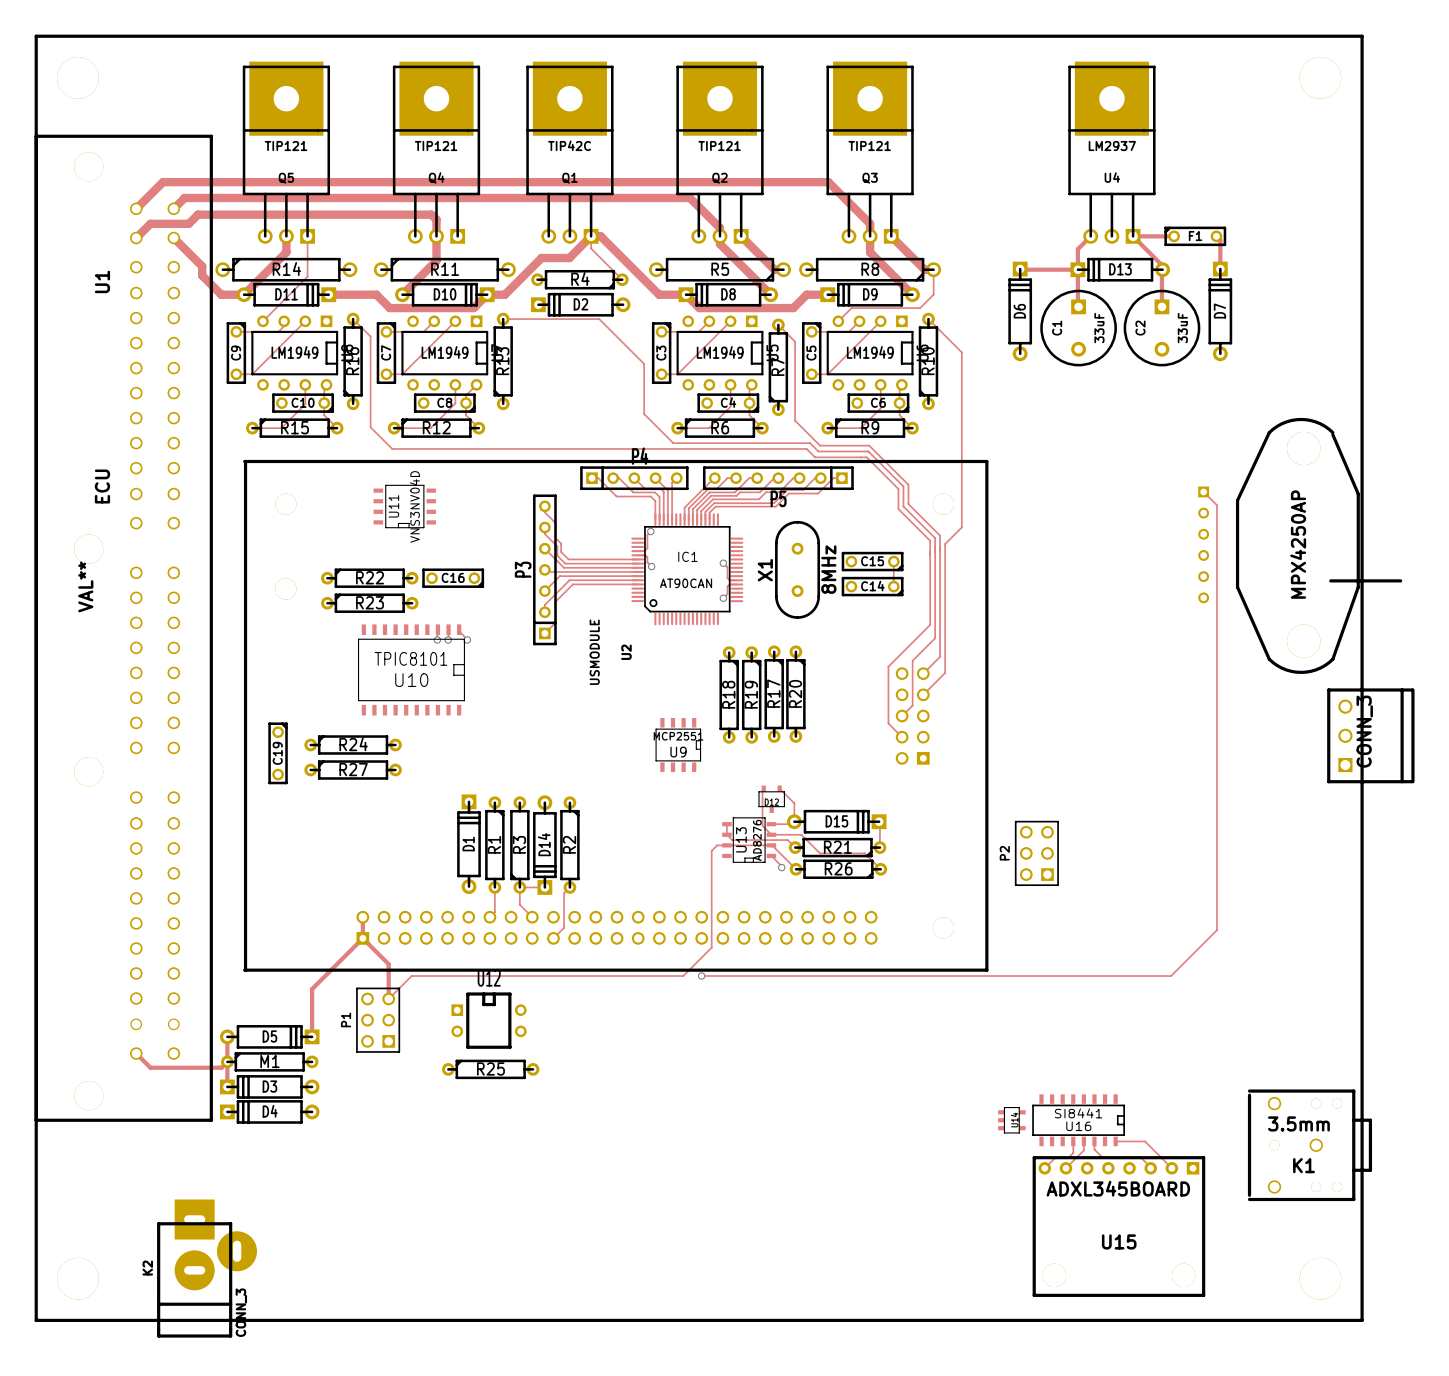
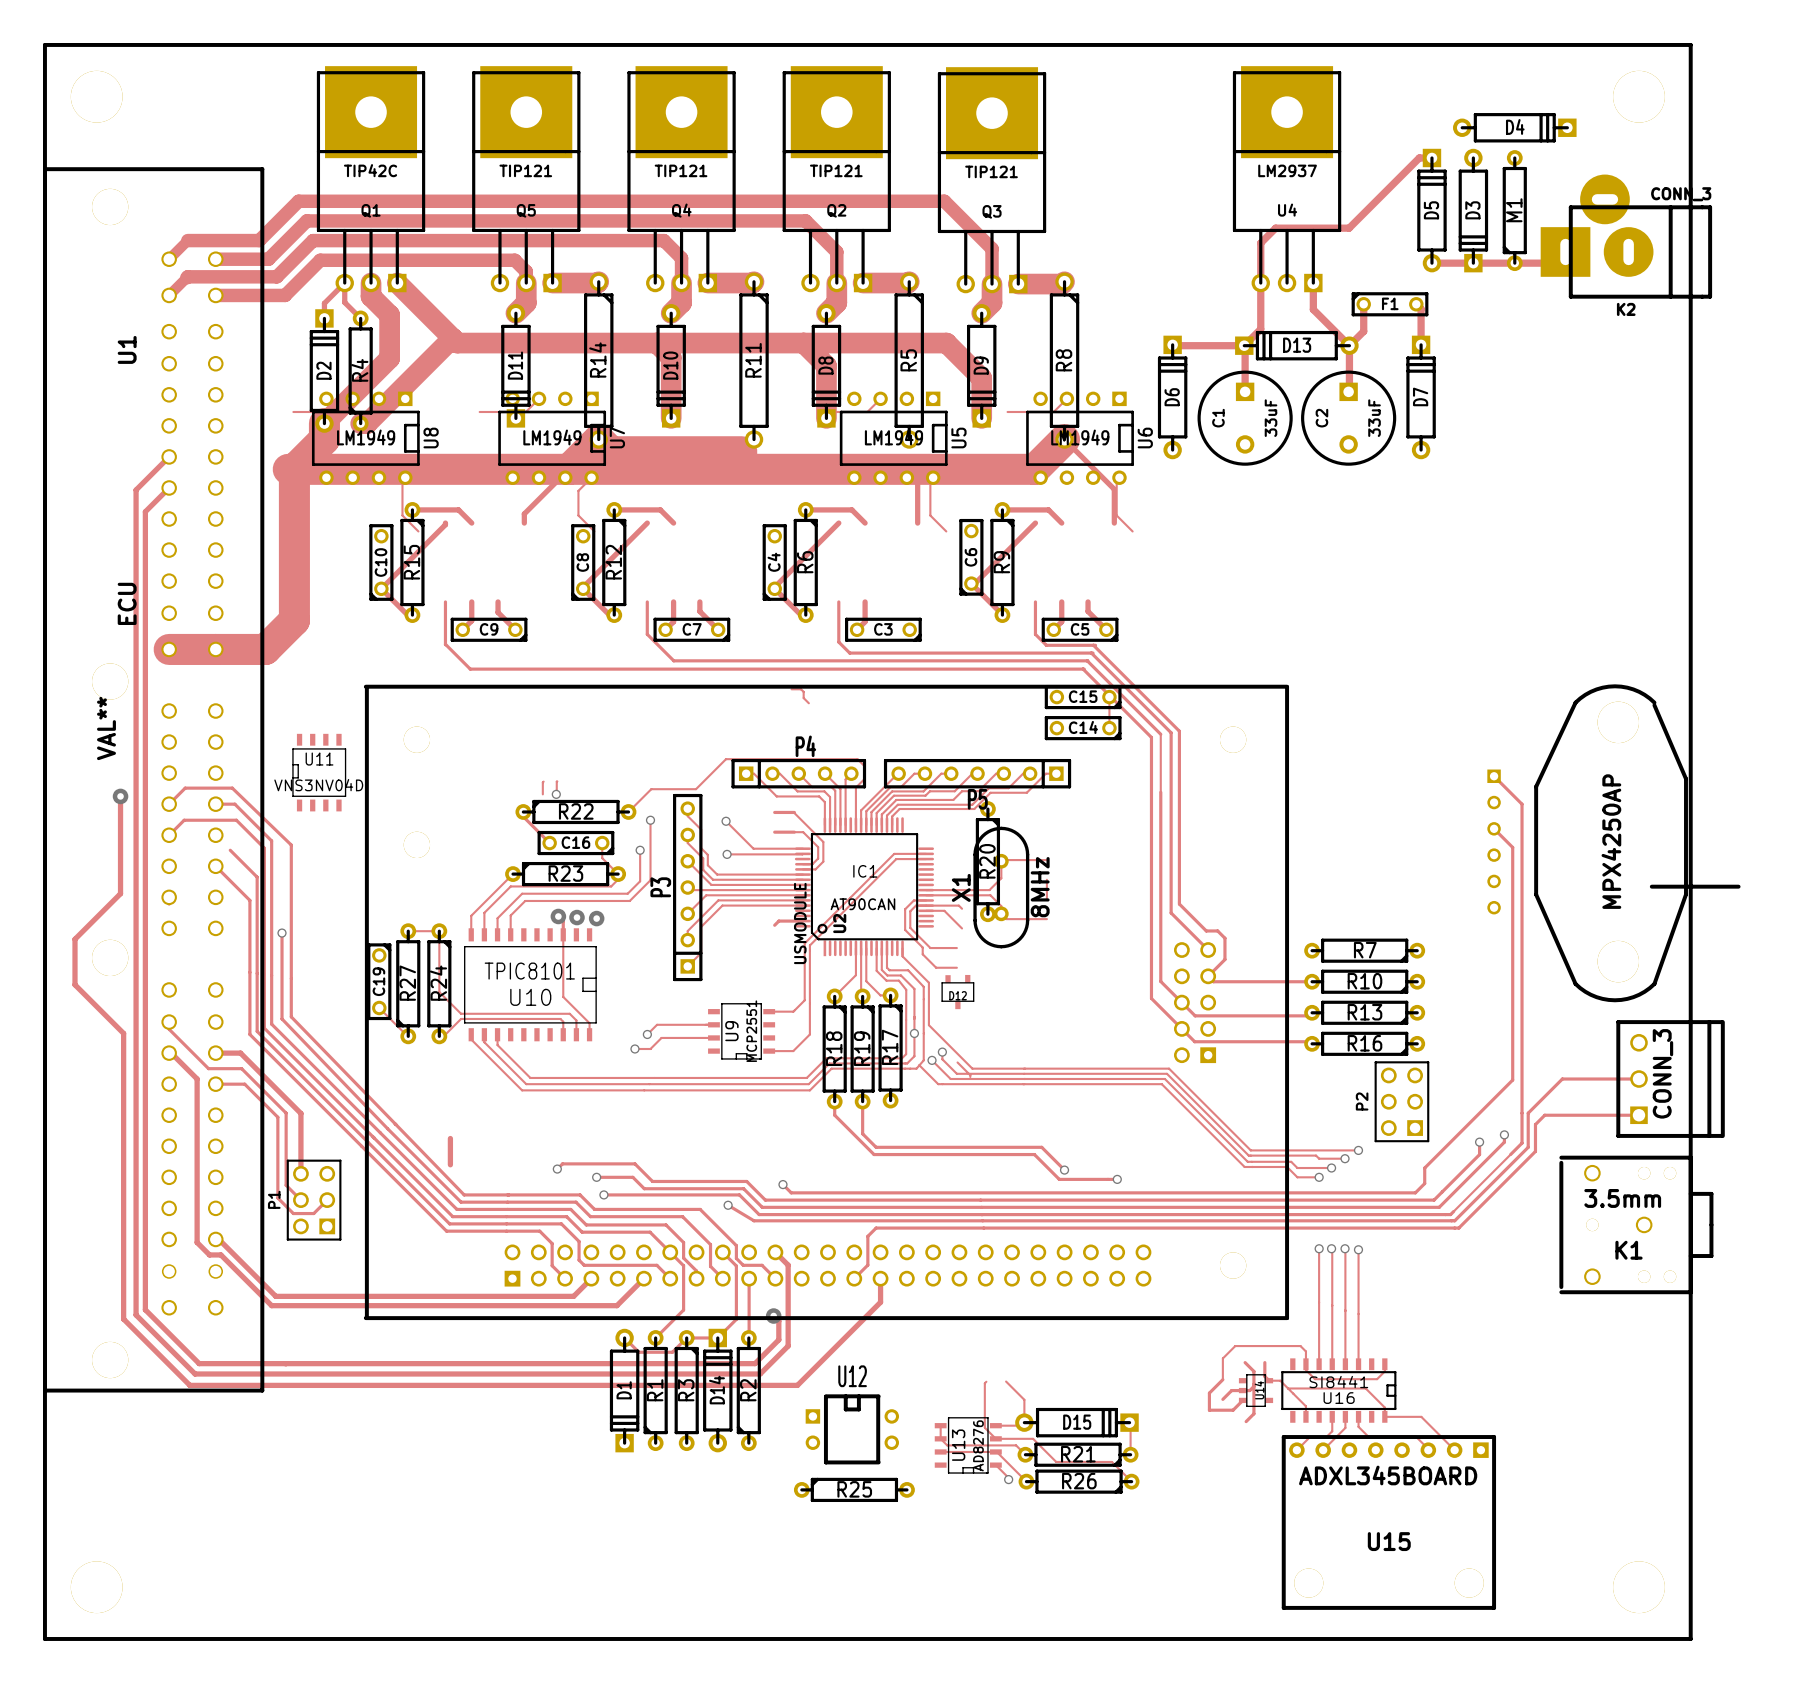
track: none -> (1431, 157) (1419, 157) (1349, 228) (1275, 228) (1260, 243) (1260, 329) (1244, 345)
Q5 position: (286, 152) -> (526, 179)
Q4 position: (436, 152) -> (681, 179)
Q1 position: (569, 152) -> (371, 179)
Q2 position: (720, 152) -> (836, 179)
Q3 position: (870, 152) -> (992, 180)
U4 position: (1111, 152) -> (1287, 179)
track: (151, 193) (162, 182) (828, 182) (870, 223) (870, 252) (912, 294) -> (187, 240) (259, 240) (298, 201) (944, 201) (992, 248) (992, 302) (981, 313)
track: none -> (1565, 251) (1554, 263) (1431, 263)
track: (173, 208) (184, 197) (689, 197) (720, 228) (720, 244) (770, 294) -> (215, 259) (268, 259) (306, 220) (805, 220) (836, 251) (836, 302) (826, 313)
track: (150, 223) (188, 223) (198, 214) (431, 214) (436, 219) (436, 260) (402, 294) -> (186, 277) (276, 276) (313, 240) (663, 240) (681, 258) (681, 302) (671, 313)
track: none -> (598, 281) (552, 283)
track: none -> (754, 281) (707, 283)
track: none -> (909, 281) (863, 283)
track: none -> (1064, 281) (1062, 284) (1018, 284)
track: none -> (371, 283) (371, 296) (389, 315) (389, 358) (324, 423) (324, 439) (294, 469) (294, 620) (265, 649) (169, 649)
track: none -> (397, 283) (457, 343) (946, 343) (981, 378) (981, 418)
track: none -> (1313, 283) (1313, 309) (1349, 345)
track: (286, 236) (286, 252) (244, 294) (221, 294) (202, 275) (202, 266) (173, 238) -> (515, 313) (526, 302) (526, 271) (514, 260) (320, 260) (285, 295) (215, 295)
track: (307, 236) (307, 276) (262, 321) -> none
track: (591, 236) (591, 248) (622, 279) -> none
track: (591, 236) (600, 236) (659, 294) (685, 294) (699, 308) (793, 308) (806, 294) (827, 294) -> none
track: (591, 236) (569, 258) (541, 258) (504, 294) (487, 294) (473, 308) (389, 308) (376, 294) (328, 294) -> none
track: (741, 236) (774, 269) (783, 269) -> none
track: (891, 236) (924, 269) (933, 269) (933, 294) (920, 308) (851, 308) (838, 321) -> none
track: (1090, 236) (1077, 249) (1078, 306) -> none
track: (1174, 236) (1133, 236) (1162, 265) (1161, 306) -> none
F1 position: (1195, 236) -> (1390, 304)
track: (1216, 236) (1220, 240) (1220, 269) -> (1416, 304) (1421, 309) (1421, 344)
track: none -> (1363, 304) (1363, 331) (1349, 345)
track: none -> (324, 318) (324, 303) (344, 283) (344, 302) (360, 318)
R14 rotation: 0° (286, 269) -> 90° clockwise (598, 360)
R14 position: (286, 269) -> (598, 360)
R11 rotation: 0° (444, 269) -> 90° clockwise (754, 360)
R11 position: (444, 269) -> (754, 360)
R5 rotation: 0° (720, 269) -> 90° counterclockwise (909, 360)
R8 rotation: 0° (870, 269) -> 90° counterclockwise (1064, 360)
track: (1020, 269) (1077, 269) -> (1172, 344) (1244, 345)
D13 position: (1120, 269) -> (1296, 345)
track: none -> (452, 338) (367, 423) (360, 423)
track: none -> (656, 343) (671, 357) (671, 418)
track: none -> (803, 343) (826, 365) (826, 418)
track: none -> (1244, 345) (1245, 391)
track: none -> (1349, 345) (1348, 391)
R4 rotation: 0° (579, 279) -> 90° clockwise (360, 371)
R4 position: (579, 279) -> (360, 371)
D11 rotation: 0° (286, 294) -> 90° clockwise (515, 365)
D11 position: (286, 294) -> (515, 365)
D10 rotation: 0° (444, 294) -> 90° clockwise (671, 365)
D10 position: (444, 294) -> (671, 365)
D8 rotation: 0° (728, 294) -> 90° counterclockwise (826, 365)
D8 position: (728, 294) -> (826, 365)
D9 rotation: 0° (870, 294) -> 90° counterclockwise (981, 365)
D9 position: (870, 294) -> (981, 365)
D2 rotation: 0° (580, 304) -> 90° clockwise (324, 371)
D2 position: (580, 304) -> (324, 371)
D6 position: (1020, 311) -> (1172, 397)
D7 position: (1220, 311) -> (1421, 397)
track: (353, 319) (370, 336) (370, 427) (392, 448) (806, 448) (815, 457) (866, 457) (898, 489) (898, 509) (930, 540) (930, 624) (888, 666) (888, 723) (902, 737) -> none
track: (503, 319) (599, 319) (644, 363) (644, 413) (673, 443) (810, 443) (818, 451) (868, 451) (903, 486) (903, 506) (935, 538) (935, 591) -> (1087, 660) (1160, 734)
track: (928, 319) (961, 352) (961, 527) (945, 544) (945, 672) (923, 694) -> none
track: (305, 321) (252, 374) (236, 374) -> none
track: (455, 321) (402, 374) (386, 374) -> none
track: (730, 321) (677, 374) (661, 374) -> none
track: (880, 321) (827, 374) (811, 374) -> none
track: (778, 324) (795, 341) (795, 420) (820, 445) (869, 445) (908, 484) (908, 504) (940, 535) (940, 656) (923, 673) -> none
C1 position: (1078, 328) -> (1245, 418)
C2 position: (1161, 328) -> (1348, 418)
C9 rotation: 0° (236, 353) -> 90° clockwise (489, 629)
C9 position: (236, 353) -> (489, 629)
C7 rotation: 0° (386, 353) -> 90° clockwise (691, 629)
C7 position: (386, 353) -> (691, 629)
C3 rotation: 0° (661, 353) -> 90° clockwise (883, 629)
C3 position: (661, 353) -> (883, 629)
C5 rotation: 0° (811, 353) -> 90° clockwise (1080, 629)
C5 position: (811, 353) -> (1080, 629)
R16 rotation: 0° (353, 361) -> 90° counterclockwise (1364, 1043)
R16 position: (353, 361) -> (1364, 1043)
R13 rotation: 0° (503, 361) -> 90° counterclockwise (1364, 1012)
R13 position: (503, 361) -> (1364, 1012)
R10 rotation: 0° (928, 361) -> 90° counterclockwise (1364, 981)
R10 position: (928, 361) -> (1364, 981)
track: none -> (741, 451) (610, 451) (598, 439) (524, 513) (524, 523)
R7 rotation: 0° (778, 367) -> 90° counterclockwise (1364, 950)
R7 position: (778, 367) -> (1364, 950)
track: none -> (169, 456) (136, 490) (136, 1315) (195, 1374) (760, 1374) (788, 1346) (788, 1265) (775, 1252)
track: none -> (288, 469) (1034, 469) (1064, 439) (1114, 489) (1114, 523)
track: none -> (904, 469) (917, 482) (917, 523)
track: (305, 384) (305, 404) (281, 428) (252, 428) -> none
track: (455, 384) (455, 403) (430, 428) (394, 428) -> none
track: (730, 384) (730, 406) (709, 428) (677, 428) -> none
track: (880, 384) (880, 408) (860, 428) (827, 428) -> none
track: none -> (169, 487) (145, 511) (145, 1309) (199, 1363) (755, 1363) (778, 1339) (778, 1321) (773, 1316)
C10 rotation: 0° (303, 403) -> 90° clockwise (381, 562)
C10 position: (303, 403) -> (381, 562)
C8 rotation: 0° (444, 403) -> 90° clockwise (583, 562)
C8 position: (444, 403) -> (583, 562)
C4 rotation: 0° (728, 403) -> 90° clockwise (774, 562)
C4 position: (728, 403) -> (774, 562)
C6 rotation: 0° (878, 403) -> 90° clockwise (971, 557)
C6 position: (878, 403) -> (971, 557)
track: none -> (412, 509) (458, 509) (471, 523)
track: none -> (614, 509) (660, 509) (673, 523)
track: none -> (805, 509) (851, 509) (865, 523)
track: none -> (1002, 509) (1048, 509) (1061, 523)
R6 footprint: [671, 418, 769, 438] -> [793, 502, 818, 623]
track: none -> (445, 523) (381, 588) (407, 615) (412, 615)
track: none -> (647, 523) (583, 587) (609, 615) (614, 615)
track: none -> (838, 523) (774, 587) (801, 615) (805, 615)
track: none -> (1035, 523) (974, 583) (971, 583) (1002, 615)
R15 rotation: 0° (294, 428) -> 90° clockwise (412, 562)
R12 rotation: 0° (436, 428) -> 90° clockwise (614, 562)
R12 position: (436, 428) -> (614, 562)
R9 rotation: 0° (870, 428) -> 90° clockwise (1002, 562)
R9 position: (870, 428) -> (1002, 562)
track: (592, 478) (598, 478) (616, 496) (650, 496) (655, 501) (655, 519) -> (746, 773) (753, 773) (776, 796) (819, 796) (824, 802) (824, 825)
track: (613, 478) (619, 478) (633, 492) (655, 492) (659, 496) (659, 519) -> (772, 773) (779, 773) (797, 791) (824, 791) (830, 797) (830, 825)
track: (634, 478) (645, 489) (660, 489) (663, 491) (663, 519) -> (798, 773) (812, 787) (831, 787) (835, 790) (835, 825)
P4 position: (634, 478) -> (798, 773)
track: (655, 478) (667, 490) (667, 519) -> (825, 773) (840, 789) (840, 825)
track: (676, 478) (672, 482) (672, 519) -> (851, 773) (845, 779) (845, 825)
track: (714, 478) (684, 507) (684, 519) -> (898, 773) (861, 810) (861, 825)
track: (736, 478) (727, 478) (716, 489) (708, 489) (688, 508) (688, 519) -> (924, 773) (914, 773) (900, 787) (890, 787) (866, 811) (866, 825)
track: (757, 478) (749, 478) (734, 492) (709, 492) (692, 509) (692, 519) -> (951, 773) (941, 773) (923, 791) (892, 791) (871, 812) (871, 825)
track: (778, 478) (774, 478) (760, 492) (740, 492) (736, 495) (711, 495) (697, 509) (697, 519) -> (977, 773) (972, 773) (954, 791) (929, 791) (925, 795) (894, 795) (876, 813) (876, 825)
P5 position: (778, 478) -> (977, 773)
track: (799, 478) (793, 478) (779, 492) (765, 492) (758, 499) (713, 499) (701, 511) (701, 519) -> (1003, 773) (996, 773) (978, 791) (962, 791) (953, 799) (896, 799) (881, 814) (881, 825)
track: (820, 478) (815, 478) (803, 489) (787, 489) (774, 503) (714, 503) (705, 511) (705, 519) -> (1030, 773) (1023, 773) (1008, 788) (988, 788) (972, 804) (897, 804) (886, 815) (886, 825)
track: (841, 478) (833, 478) (818, 493) (788, 493) (775, 506) (715, 506) (709, 512) (709, 519) -> (1056, 773) (1045, 773) (1026, 792) (990, 792) (974, 809) (899, 809) (892, 816) (892, 825)
track: none -> (445, 601) (445, 644)
track: none -> (471, 601) (471, 620) (462, 629)
track: none -> (498, 601) (498, 612) (515, 629)
track: none -> (647, 601) (647, 634) (673, 660) (1087, 660)
track: none -> (673, 601) (673, 621) (665, 629)
track: none -> (699, 601) (699, 611) (718, 629)
track: none -> (838, 601) (838, 642) (849, 653) (1093, 653)
track: none -> (865, 601) (865, 621) (857, 629)
track: none -> (1035, 601) (1035, 634) (1046, 645) (1095, 645)
track: none -> (1061, 601) (1061, 621) (1053, 629)
track: none -> (1088, 601) (1088, 611) (1106, 629)
track: (1203, 491) (1217, 505) (1217, 930) -> (1494, 776) (1522, 804) (1522, 1143) (1510, 1154)
U11 rotation: 0° (404, 506) -> 90° clockwise (319, 772)
U11 position: (404, 506) -> (319, 772)
track: (544, 506) (544, 512) (555, 523) (555, 538) (561, 543) (561, 551) (568, 559) (637, 559) -> (687, 808) (687, 816) (701, 829) (701, 848) (707, 854) (707, 865) (717, 874) (802, 874)
track: none -> (445, 644) (470, 669) (1084, 669)
track: none -> (1093, 645) (1179, 731) (1179, 904) (1206, 930) (1217, 930) (1224, 938) (1224, 959) (1208, 976) (1213, 981) (1312, 981)
track: none -> (1091, 653) (1171, 732) (1171, 912) (1208, 950)
track: (544, 527) (544, 534) (557, 546) (557, 555) (565, 563) (637, 563) -> (687, 834) (687, 843) (703, 858) (703, 869) (713, 879) (802, 879)
track: (650, 531) (647, 534) (647, 548) (644, 551) (637, 551) -> none
via: (650, 531) -> none
track: none -> (1083, 669) (1151, 737) (1151, 998) (1194, 1041) (1309, 1041) (1312, 1043)
part position: (1300, 545) -> (1613, 843)
track: (544, 548) (563, 567) (637, 567) -> (687, 861) (711, 884) (802, 884)
track: (723, 563) (727, 567) (727, 578) (729, 580) (736, 580) -> none
via: (723, 563) -> none
via: (651, 566) -> none
track: (544, 569) (546, 571) (637, 571) -> (687, 887) (690, 890) (802, 890)
P3 position: (544, 569) -> (687, 887)
IC1 position: (687, 569) -> (864, 886)
X1 position: (797, 569) -> (1001, 887)
track: (637, 576) (559, 576) (544, 591) -> (802, 895) (706, 895) (687, 913)
R22 position: (369, 578) -> (575, 811)
C16 position: (453, 578) -> (575, 843)
track: (637, 580) (569, 580) (544, 604) (544, 612) -> (802, 900) (718, 900) (687, 931) (687, 940)
track: (637, 584) (572, 584) (555, 601) (555, 622) (544, 633) -> (802, 905) (722, 905) (701, 926) (701, 952) (687, 966)
track: (736, 584) (729, 584) (727, 586) (727, 594) (723, 598) -> none
via: (723, 598) -> none
R23 position: (369, 603) -> (565, 874)
track: (459, 629) (467, 639) -> none
track: (935, 638) (912, 660) (912, 705) (902, 715) -> (1160, 792) (1160, 981) (1195, 1015) (1309, 1015) (1312, 1012)
via: (437, 639) -> none
via: (467, 639) -> none
track: none -> (120, 796) (120, 893) (74, 939) (74, 984) (123, 1033) (123, 1319) (189, 1385) (797, 1385) (880, 1302) (880, 1278)
via: none -> (120, 796)
R18 footprint: [719, 646, 739, 744] -> [822, 988, 847, 1110]
track: none -> (169, 804) (185, 788) (232, 788) (291, 845) (291, 1016) (395, 1124)
track: none -> (215, 804) (234, 804) (271, 840) (271, 1024) (456, 1209) (570, 1209) (586, 1224) (666, 1224) (683, 1242) (683, 1258) (696, 1270) (696, 1278)
track: none -> (523, 811) (523, 816) (549, 843)
track: none -> (628, 811) (651, 789) (696, 789) (726, 759) (857, 759) (864, 766) (864, 778) (855, 787) (855, 825)
track: none -> (774, 812) (794, 812) (823, 841) (823, 861) (815, 869) (802, 869)
track: none -> (650, 820) (650, 880) (629, 900) (525, 900) (510, 915) (510, 934)
via: none -> (650, 820)
track: none -> (726, 821) (753, 848) (802, 848)
via: none -> (726, 821)
track: none -> (1494, 828) (1512, 847) (1512, 1080) (1424, 1168) (1424, 1183) (1415, 1192) (791, 1192) (782, 1184)
U10 position: (411, 669) -> (530, 984)
track: none -> (774, 832) (803, 832) (818, 847) (818, 858) (812, 864) (802, 864)
track: none -> (169, 835) (184, 820) (236, 820) (264, 848) (264, 1028) (452, 1216) (566, 1216) (582, 1232) (650, 1232) (683, 1265) (683, 1310) (655, 1337)
track: none -> (602, 843) (602, 858) (618, 874) (618, 879) (611, 886) (510, 886) (484, 912) (484, 934)
track: none -> (230, 850) (257, 877) (257, 1031) (449, 1223) (561, 1223) (579, 1241) (579, 1260) (584, 1265) (656, 1265) (670, 1278)
track: none -> (640, 850) (640, 881) (627, 893) (522, 893) (497, 918) (497, 934)
via: none -> (640, 850)
track: none -> (802, 853) (727, 854)
track: none -> (926, 853) (894, 853) (804, 943) (804, 1000) (793, 1011) (769, 1011)
via: none -> (727, 854)
track: none -> (926, 859) (896, 859) (809, 945) (809, 1034) (793, 1051) (769, 1051)
track: none -> (1046, 860) (1002, 860) (1001, 878) (989, 890) (926, 890)
R19 position: (751, 694) -> (862, 1049)
R17 position: (774, 694) -> (890, 1047)
track: none -> (215, 866) (249, 900) (249, 1034) (446, 1231) (539, 1231) (552, 1243) (552, 1265) (565, 1278)
track: none -> (513, 874) (471, 915) (471, 934)
track: none -> (1046, 879) (1046, 899)
U2 position: (615, 715) -> (826, 1002)
track: none -> (926, 895) (990, 895) (1001, 906) (1001, 913) (1006, 919) (1046, 919)
track: none -> (926, 900) (913, 900) (905, 909) (905, 929) (922, 947) (922, 954) (936, 967) (956, 967)
track: none -> (962, 908) (958, 905) (915, 905) (910, 911) (910, 927) (930, 948) (956, 948)
track: none -> (926, 910) (944, 910) (962, 928)
part position: (1370, 735) -> (1670, 1079)
track: none -> (558, 916) (563, 921) (563, 996) (589, 1023) (589, 1034)
via: none -> (558, 916)
via: none -> (576, 917)
via: none -> (596, 918)
track: none -> (802, 921) (778, 921) (774, 925)
R24 rotation: 0° (353, 744) -> 90° clockwise (439, 983)
U9 rotation: 0° (678, 745) -> 90° clockwise (741, 1031)
U9 position: (678, 745) -> (741, 1031)
track: none -> (408, 931) (439, 931) (439, 992) (461, 1013) (569, 1013) (576, 1020) (576, 1034)
track: none -> (282, 933) (282, 1018) (461, 1202) (575, 1202) (590, 1216) (682, 1216) (710, 1244) (710, 1266) (722, 1278)
via: none -> (282, 933)
C19 position: (278, 753) -> (379, 981)
track: none -> (855, 948) (855, 975) (834, 996)
track: none -> (861, 948) (862, 996)
track: none -> (866, 948) (866, 981) (880, 995) (890, 995)
track: none -> (876, 948) (876, 970) (886, 980) (898, 980) (906, 989) (906, 1054) (902, 1058) (826, 1058) (806, 1077) (530, 1077) (497, 1045) (497, 1034)
track: none -> (881, 948) (881, 969) (887, 975) (900, 975) (914, 988) (914, 1056) (907, 1063) (829, 1063) (808, 1084) (526, 1084) (484, 1042) (484, 1034)
track: none -> (886, 948) (886, 967) (889, 970) (908, 970) (923, 986) (923, 1060) (916, 1068) (831, 1068) (809, 1090) (522, 1090) (471, 1039) (471, 1034)
track: none -> (902, 948) (902, 956) (928, 982) (928, 1025) (972, 1068) (1169, 1068) (1250, 1150) (1358, 1150)
R27 rotation: 0° (353, 770) -> 90° counterclockwise (408, 983)
track: (763, 788) (762, 825) (771, 834) (801, 834) (820, 853) (864, 853) (880, 869) -> none
track: (779, 788) (794, 803) (794, 821) (791, 824) (771, 824) -> none
D15 footprint: [786, 809, 887, 834] -> [1015, 1407, 1139, 1438]
track: none -> (379, 1008) (408, 1036)
track: (879, 821) (879, 847) -> none
track: none -> (169, 1022) (169, 1029) (208, 1068) (241, 1068) (286, 1113) (286, 1185) (300, 1200)
track: (726, 824) (726, 834) (732, 840) (787, 840) (795, 847) -> none
track: none -> (713, 1024) (657, 1024) (647, 1034)
via: none -> (914, 1033)
track: none -> (563, 1034) (563, 1021) (560, 1018) (461, 1018) (443, 1036) (439, 1036)
via: none -> (647, 1034)
track: none -> (713, 1037) (661, 1037) (650, 1048) (634, 1048)
U13 position: (749, 840) -> (968, 1445)
D1 rotation: 0° (469, 844) -> 180° (624, 1390)
D1 position: (469, 844) -> (624, 1390)
R1 rotation: 0° (494, 845) -> 180° (655, 1390)
R1 position: (494, 845) -> (655, 1390)
via: none -> (634, 1048)
R3 rotation: 0° (519, 845) -> 180° (686, 1390)
R3 position: (519, 845) -> (686, 1390)
D14 rotation: 0° (544, 845) -> 180° (717, 1390)
D14 position: (544, 845) -> (717, 1390)
R2 rotation: 0° (569, 845) -> 180° (748, 1390)
R2 position: (569, 845) -> (748, 1390)
track: none -> (942, 1052) (942, 1059) (956, 1073) (1166, 1073) (1248, 1155) (1316, 1155) (1319, 1158) (1345, 1158)
via: none -> (942, 1052)
R21 position: (837, 847) -> (1078, 1454)
track: none -> (169, 1053) (197, 1078) (197, 1242) (209, 1254) (220, 1254) (271, 1305) (616, 1305) (643, 1278)
track: none -> (217, 1054) (215, 1053) (240, 1053) (300, 1113) (300, 1173)
P2 position: (1036, 853) -> (1401, 1101)
track: none -> (932, 1060) (950, 1078) (1164, 1078) (1247, 1161) (1291, 1161) (1297, 1168) (1331, 1168)
via: none -> (932, 1060)
track: none -> (919, 1065) (938, 1084) (1161, 1084) (1244, 1166) (1287, 1166) (1297, 1177) (1319, 1177)
via: (781, 867) -> none
track: (796, 869) (772, 845) (717, 845) (711, 850) (711, 947) (683, 976) (411, 976) (388, 999) (388, 964) (362, 938) (312, 989) (312, 1036) -> none
R26 position: (838, 869) -> (1079, 1481)
track: none -> (1638, 1079) (1562, 1079) (1528, 1113) (1528, 1147) (1454, 1220) (754, 1220) (728, 1205)
track: none -> (215, 1084) (244, 1084) (277, 1117) (277, 1198) (293, 1213) (313, 1213) (327, 1200)
track: (494, 887) (494, 912) (489, 917) -> none
track: (544, 887) (519, 887) (519, 904) (532, 917) -> none
track: (569, 887) (564, 893) (564, 927) (553, 938) -> none
track: none -> (834, 1101) (834, 1115) (874, 1154) (1034, 1154) (1059, 1179) (1117, 1179)
track: none -> (862, 1101) (862, 1133) (876, 1147) (1041, 1147) (1064, 1170)
track: none -> (1638, 1115) (1544, 1115) (1535, 1124) (1535, 1151) (1458, 1228) (876, 1228) (867, 1236) (867, 1265) (854, 1278)
track: none -> (395, 1124) (464, 1194) (580, 1194) (594, 1209) (700, 1209) (736, 1245) (736, 1258) (743, 1265) (762, 1265) (775, 1278)
track: none -> (1504, 1134) (1504, 1142) (1439, 1207) (762, 1207) (743, 1188) (644, 1188) (632, 1177) (596, 1177)
via: none -> (1504, 1134)
track: none -> (1479, 1142) (1479, 1154) (1434, 1200) (765, 1200) (746, 1181) (652, 1181) (634, 1163) (562, 1163) (557, 1169)
via: none -> (1479, 1142)
via: none -> (1358, 1150)
via: none -> (1345, 1158)
via: none -> (1331, 1168)
via: none -> (557, 1169)
via: none -> (1064, 1170)
via: none -> (596, 1177)
via: none -> (1319, 1177)
via: none -> (1117, 1179)
via: none -> (782, 1184)
via: none -> (603, 1194)
via: none -> (728, 1205)
track: (701, 976) (1171, 976) -> (603, 1194) (739, 1194) (759, 1214) (1450, 1214) (1453, 1211)
via: (701, 976) -> none
track: none -> (215, 1239) (218, 1239) (275, 1296) (573, 1296) (591, 1278)
track: none -> (1319, 1248) (1319, 1364)
via: none -> (1319, 1248)
track: none -> (1331, 1248) (1332, 1364)
via: none -> (1331, 1248)
track: none -> (1345, 1248) (1345, 1364)
via: none -> (1345, 1248)
track: none -> (1358, 1249) (1358, 1364)
via: none -> (1358, 1249)
track: none -> (722, 1252) (736, 1265) (736, 1319) (717, 1337) (686, 1337) (672, 1352) (638, 1352) (624, 1337)
P1 position: (378, 1020) -> (314, 1200)
U12 position: (489, 1020) -> (852, 1429)
track: none -> (749, 1278) (748, 1337)
track: (227, 1036) (227, 1086) -> none
D5 rotation: 0° (269, 1036) -> 90° counterclockwise (1431, 210)
D5 position: (269, 1036) -> (1431, 210)
track: (136, 1053) (150, 1067) (221, 1067) (227, 1061) -> none
via: none -> (773, 1316)
M1 rotation: 0° (269, 1061) -> 90° counterclockwise (1514, 210)
M1 position: (269, 1061) -> (1514, 210)
R25 position: (490, 1069) -> (854, 1489)
D3 rotation: 0° (269, 1086) -> 90° counterclockwise (1473, 210)
D3 position: (269, 1086) -> (1473, 210)
track: none -> (1245, 1362) (1253, 1371) (1253, 1413) (1246, 1421)
track: none -> (1264, 1362) (1264, 1376) (1269, 1380) (1280, 1380) (1305, 1406) (1305, 1416)
track: none -> (1384, 1364) (1384, 1371) (1377, 1379) (1315, 1379) (1305, 1370) (1305, 1351) (1300, 1346) (1235, 1346) (1222, 1358) (1222, 1379) (1209, 1393) (1209, 1410) (1233, 1410) (1242, 1400)
D4 rotation: 0° (269, 1111) -> 180° (1514, 127)
D4 position: (269, 1111) -> (1514, 127)
track: none -> (986, 1381) (984, 1427) (995, 1438) (1033, 1438) (1056, 1461) (1111, 1461) (1131, 1481)
track: none -> (1006, 1381) (1024, 1399) (1024, 1422) (1021, 1425) (995, 1425)
track: none -> (1253, 1386) (1249, 1390) (1231, 1390) (1222, 1399)
track: none -> (1288, 1388) (1365, 1388) (1384, 1407) (1384, 1416)
K1 position: (1309, 1145) -> (1636, 1224)
track: none -> (1129, 1422) (1130, 1454)
track: none -> (940, 1425) (940, 1438) (947, 1445) (1016, 1445) (1025, 1454)
track: none -> (940, 1451) (996, 1451) (1026, 1481)
track: none -> (995, 1465) (1008, 1479)
via: none -> (1008, 1479)
K2 rotation: 0° (207, 1268) -> 90° counterclockwise (1626, 236)
K2 position: (207, 1268) -> (1626, 236)

